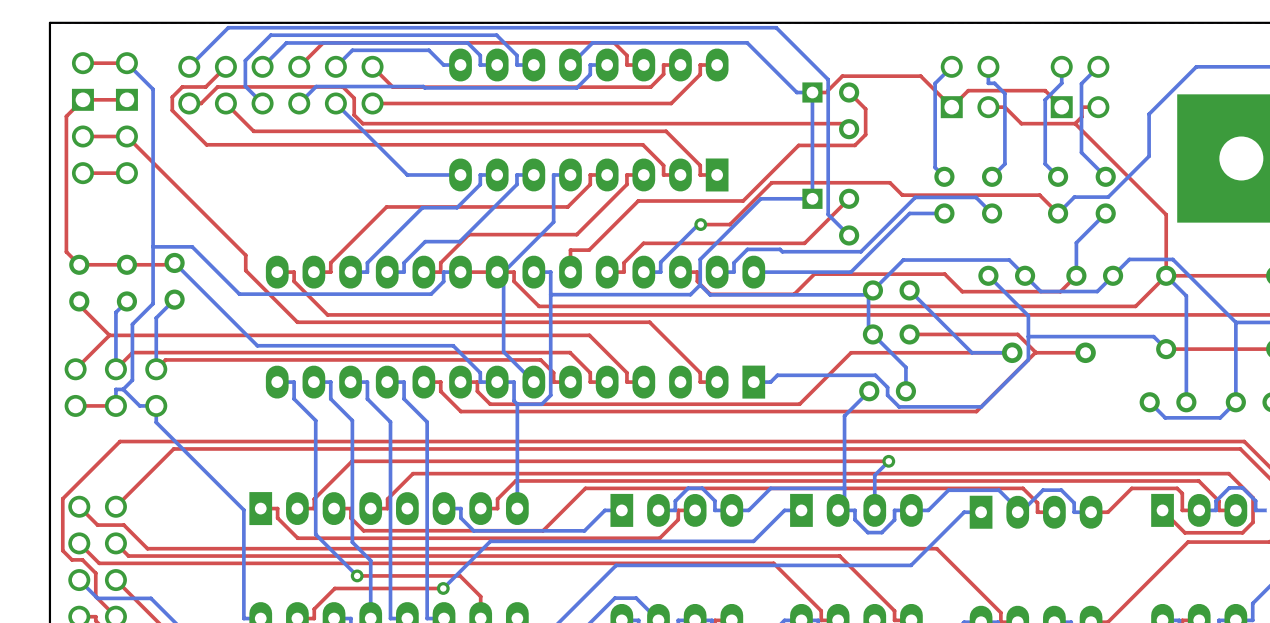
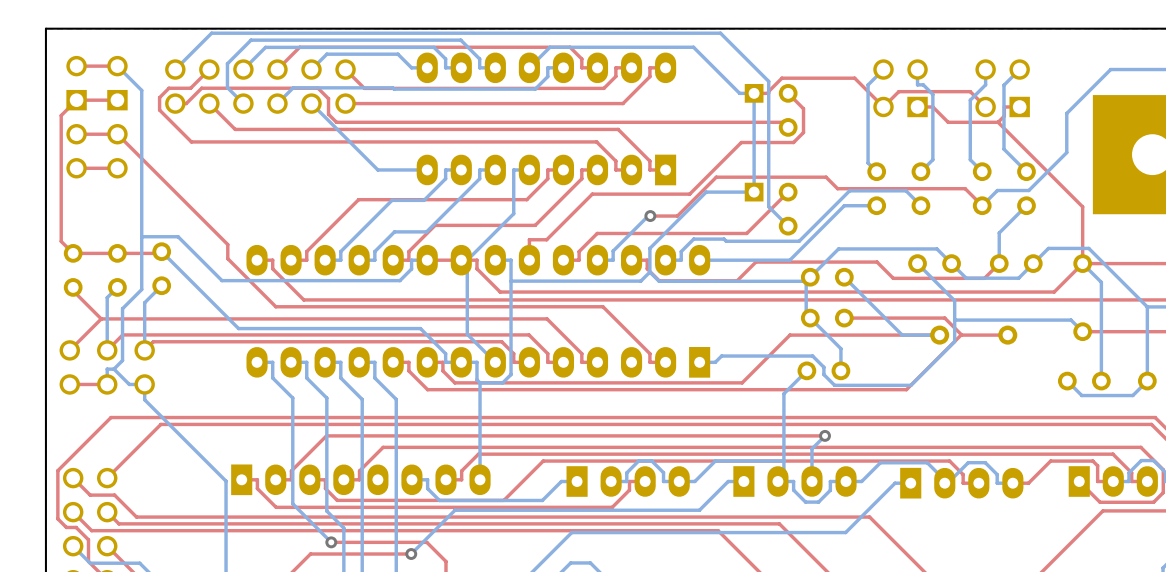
part rotation: 0° (970, 107) -> 180° (900, 106)
part rotation: 0° (1080, 107) -> 180° (1002, 106)

